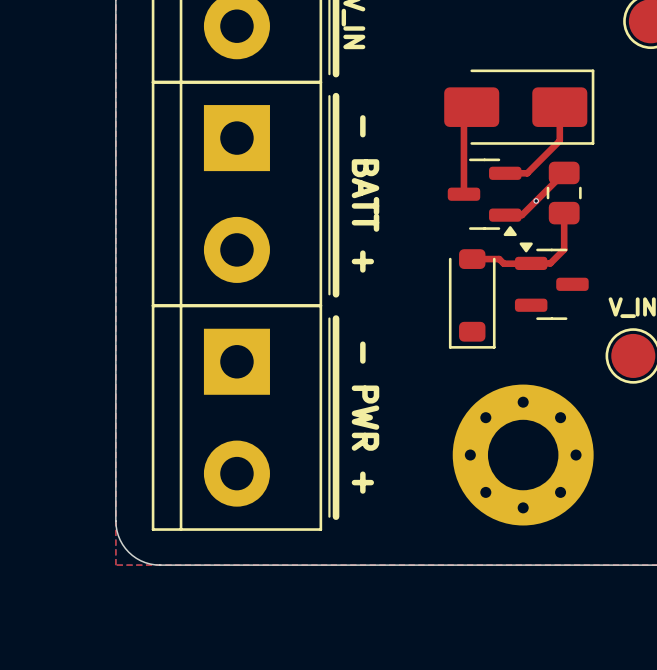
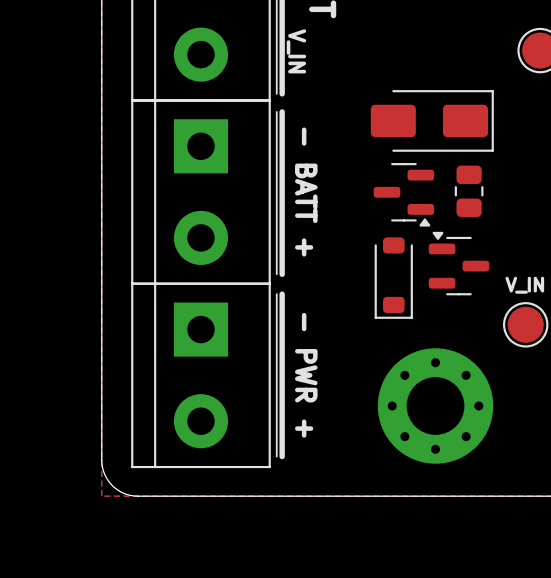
top track: (471, 107) (463, 114) (463, 194) -> none
top track: (559, 107) (559, 140) (527, 173) (505, 173) -> none
top track: (564, 172) (522, 215) (505, 215) -> none
via: (536, 200) -> none
top track: (564, 213) (564, 249) (550, 263) (531, 263) -> none
top track: (472, 259) (499, 259) (503, 263) (530, 263) -> none

